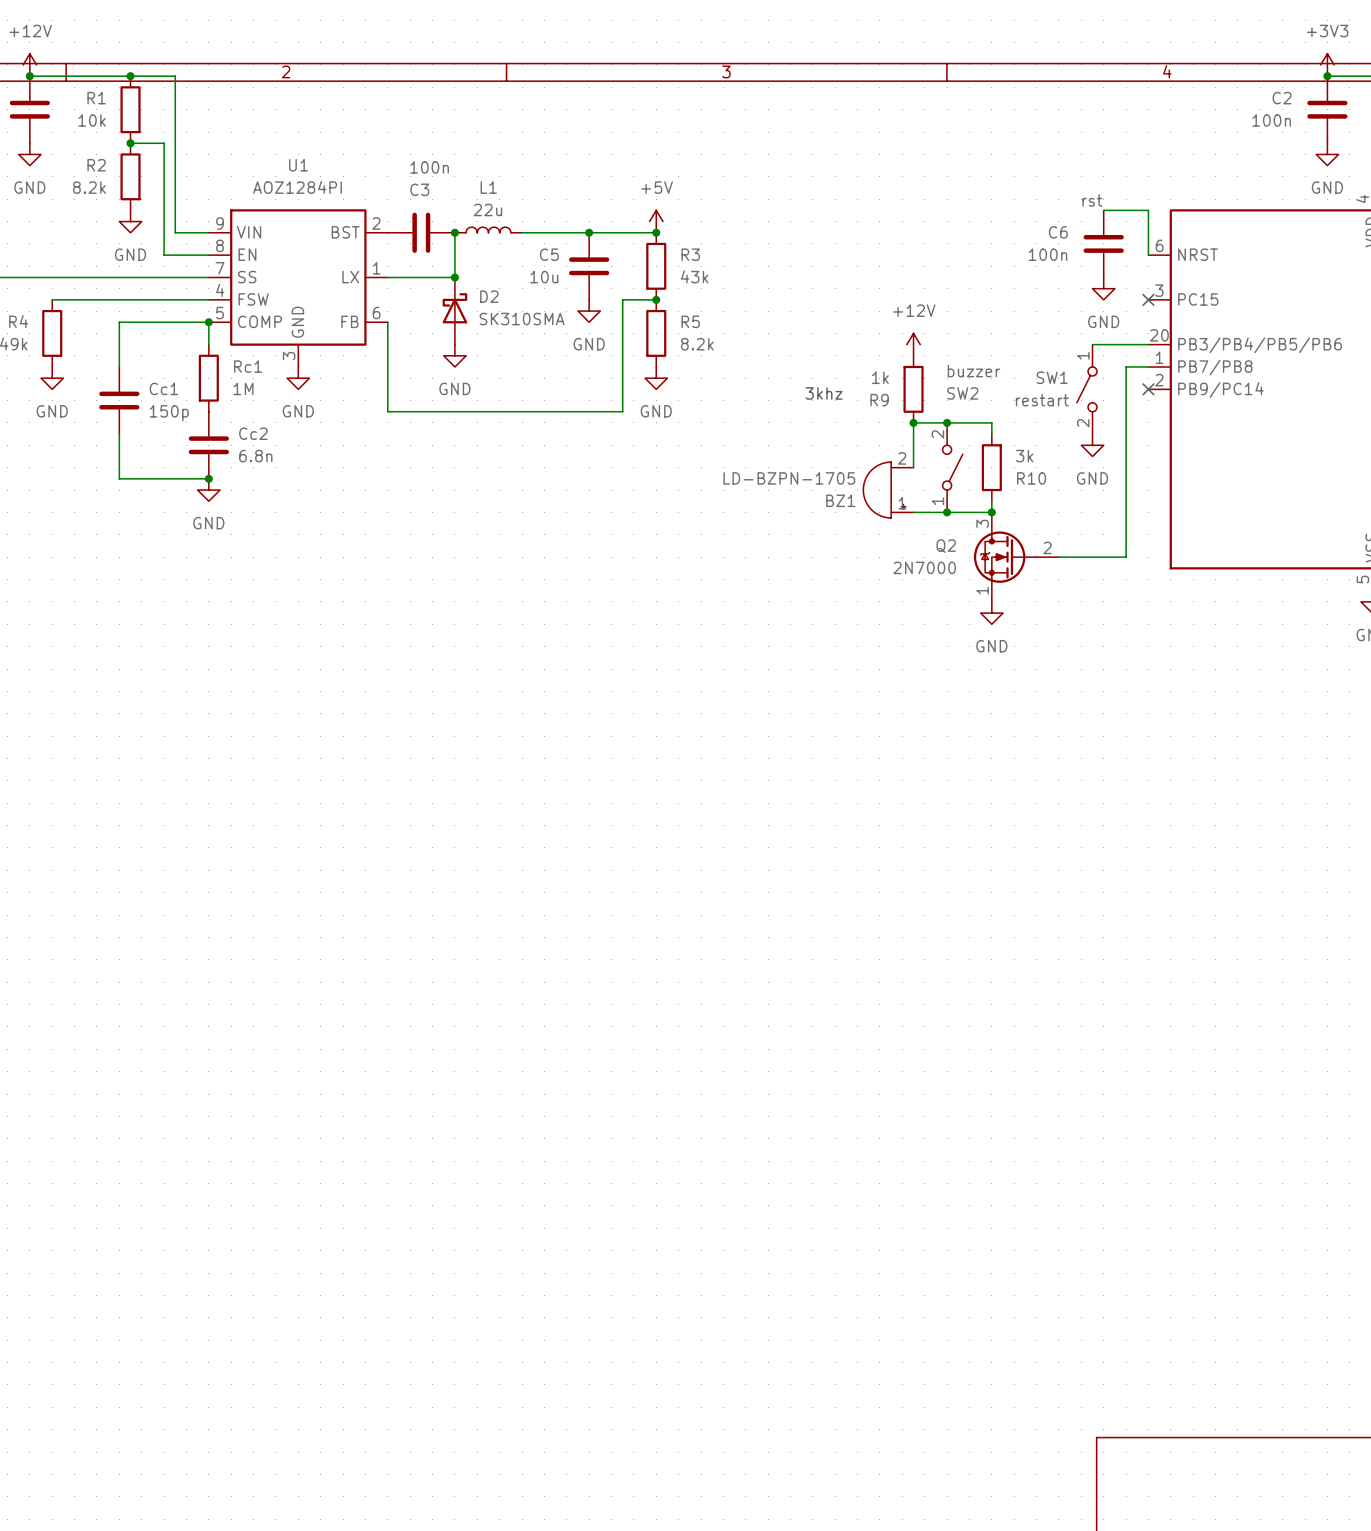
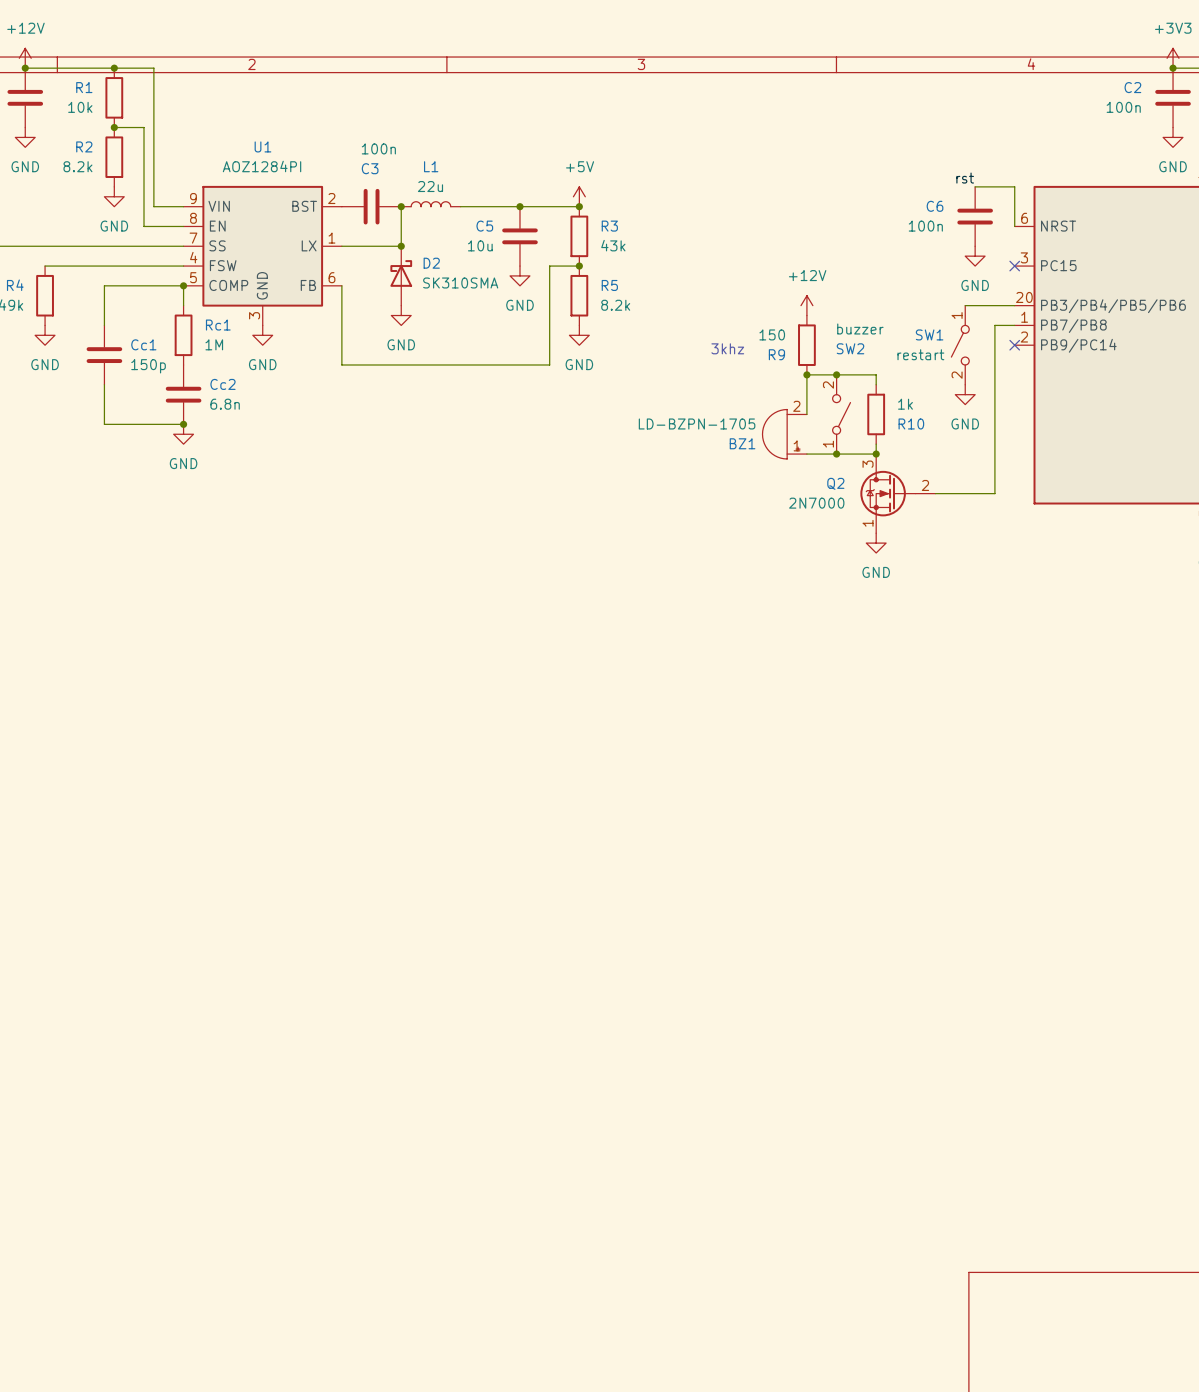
R9 value: 1k (880, 377) -> 150 (772, 334)
R10 value: 3k (1024, 456) -> 1k (905, 404)

